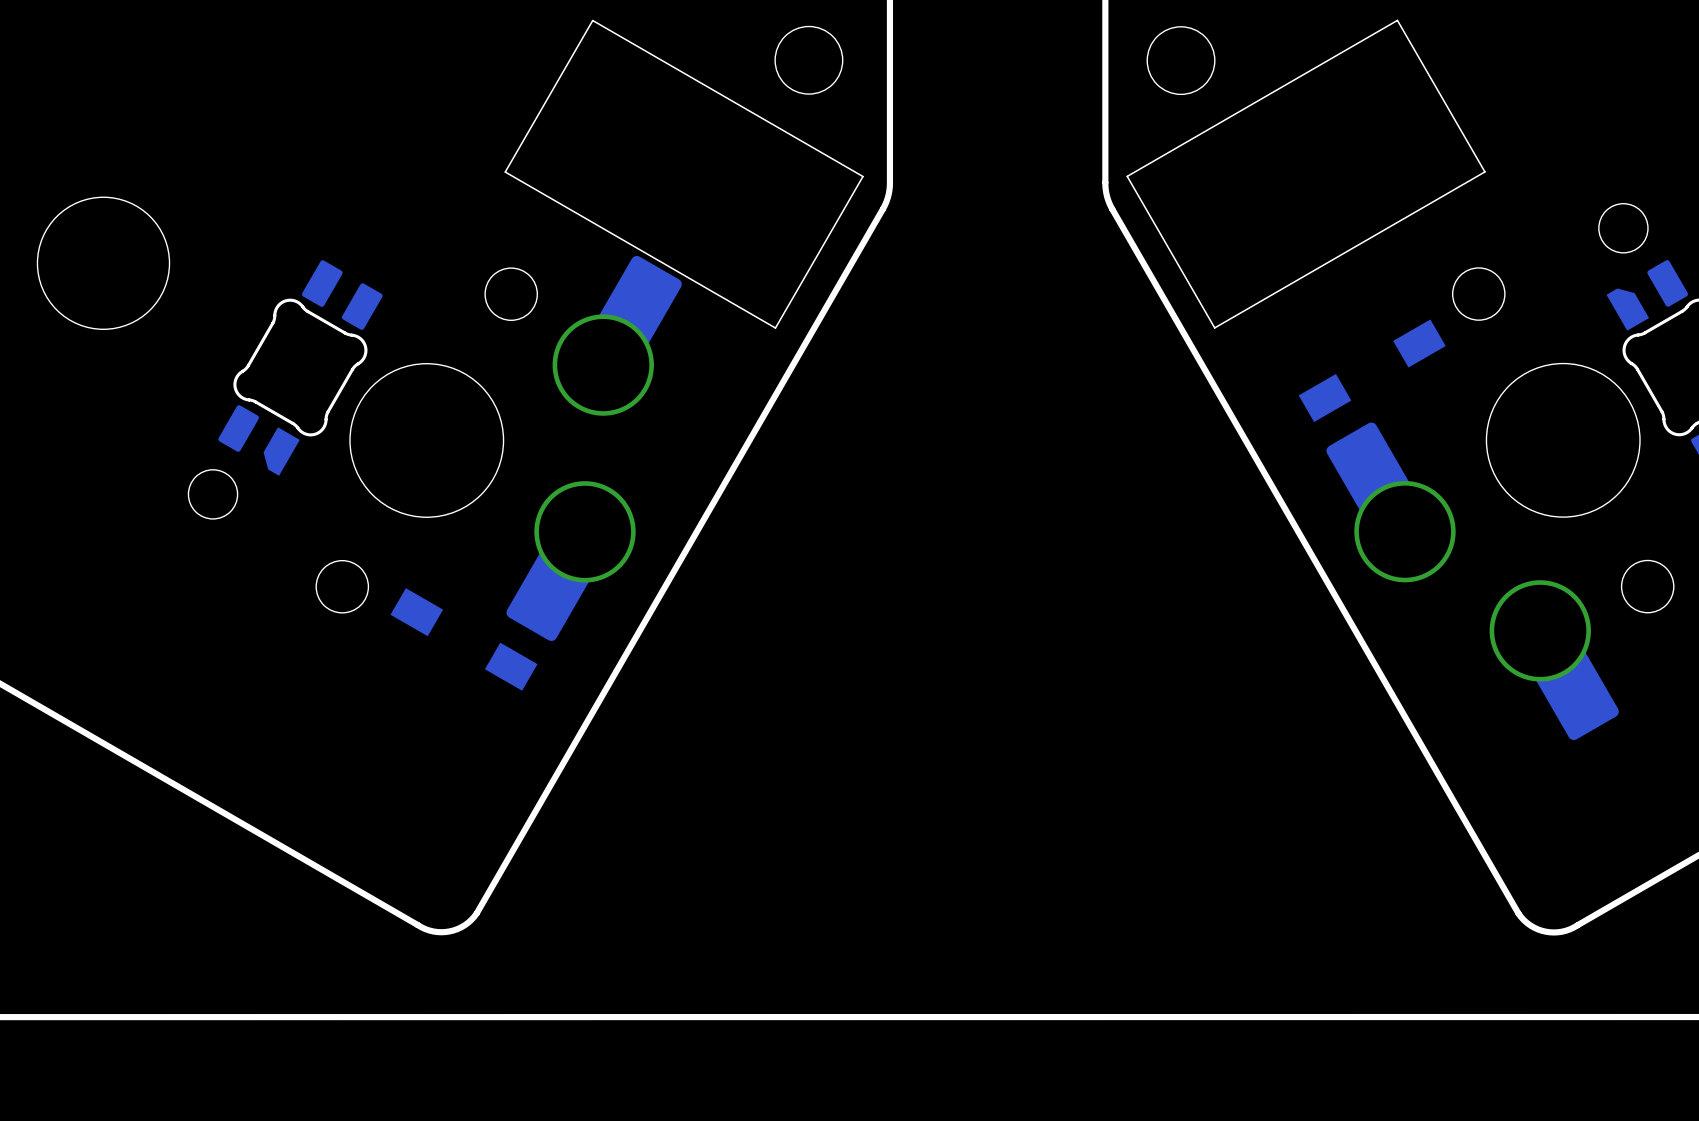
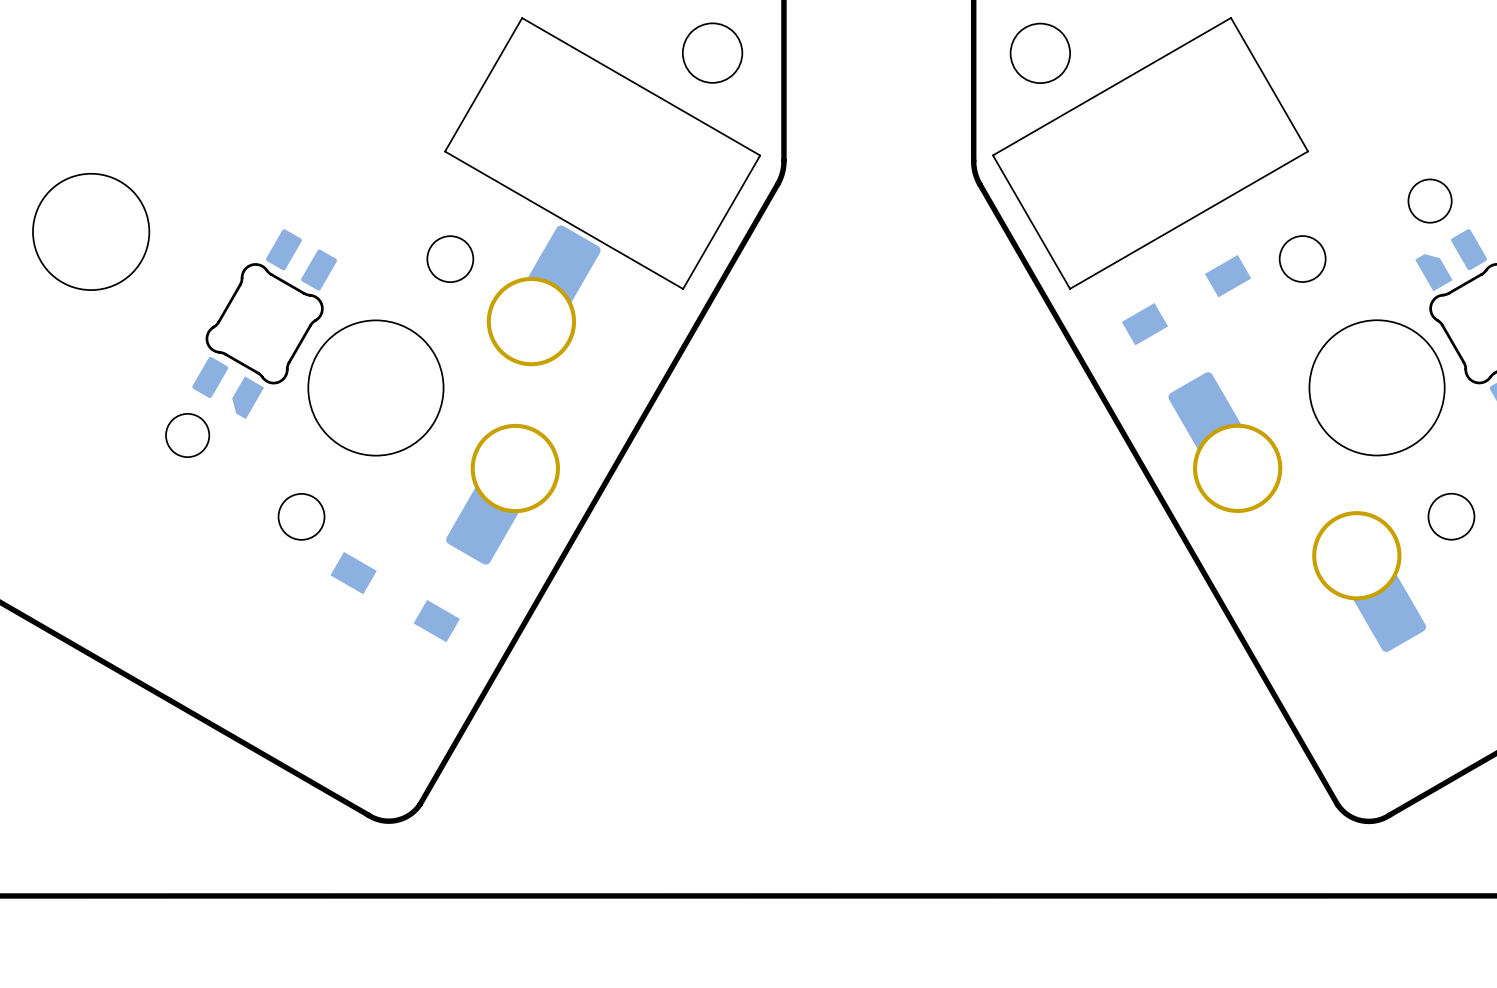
part position: (1372, 370) -> (1186, 300)
part position: (464, 639) -> (395, 597)

